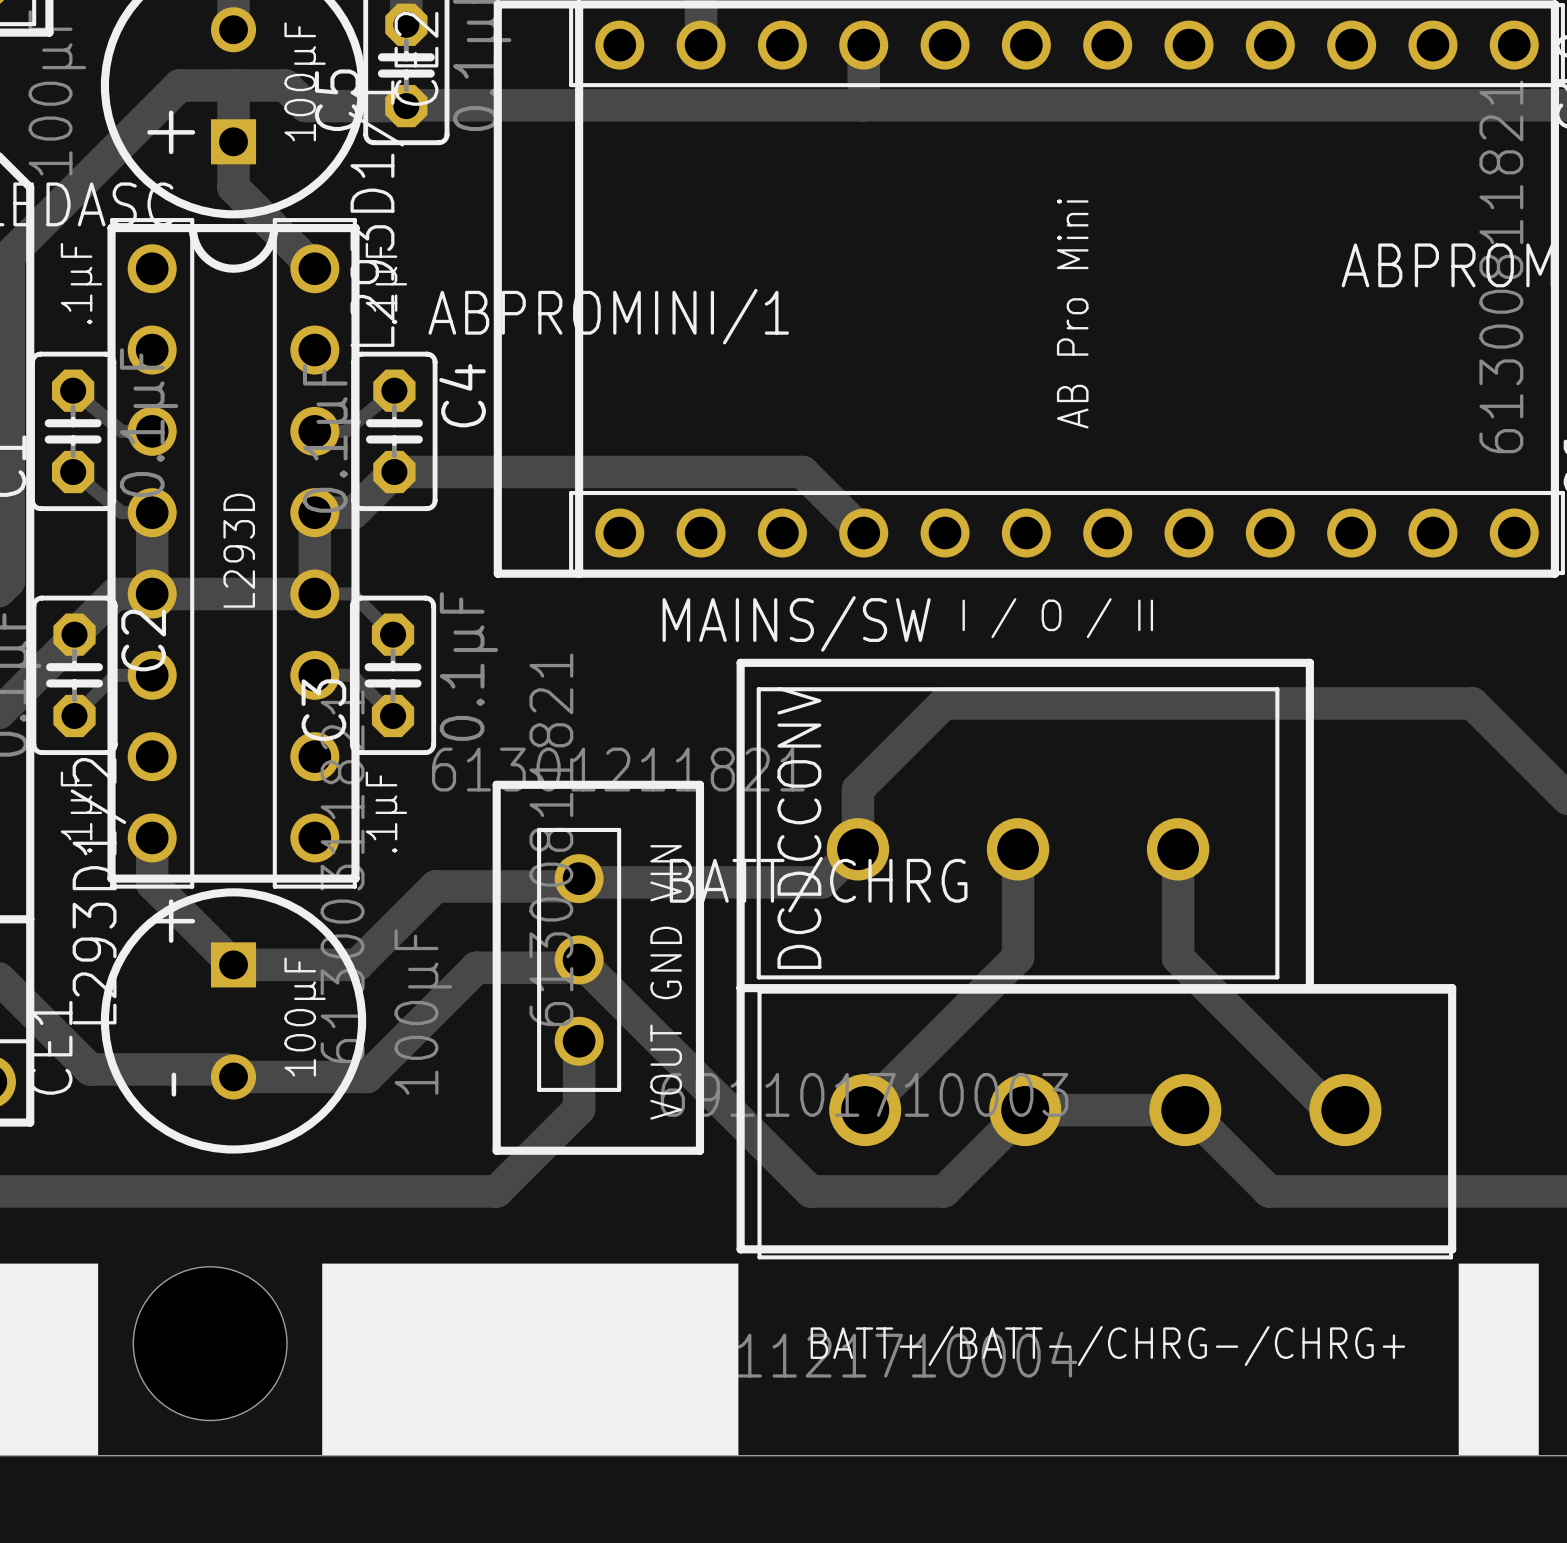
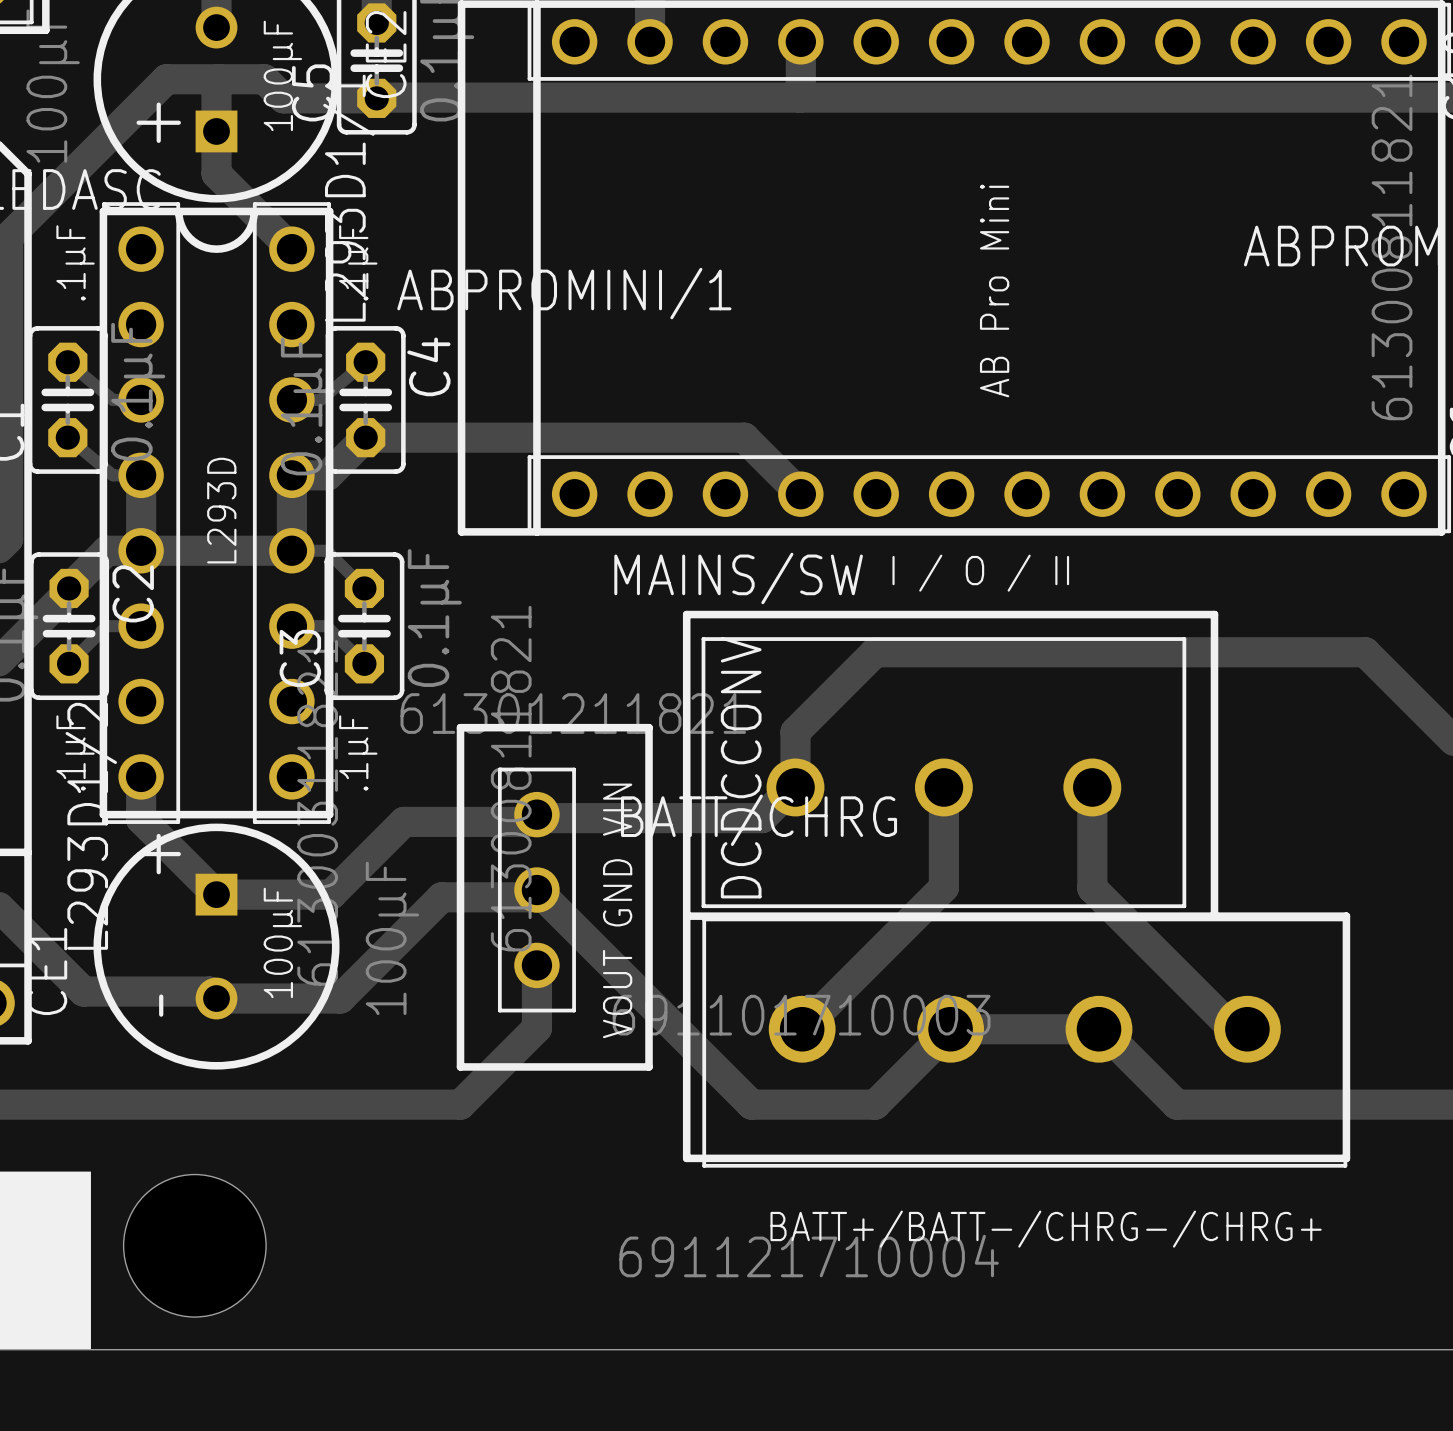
drawing: [322, 1263, 739, 1456] -> none
drawing: [1458, 1263, 1539, 1456] -> none
text position: BATT+/BATT-/CHRG-/CHRG+ (1107, 1345) -> BATT+/BATT-/CHRG-/CHRG+ (1046, 1229)

